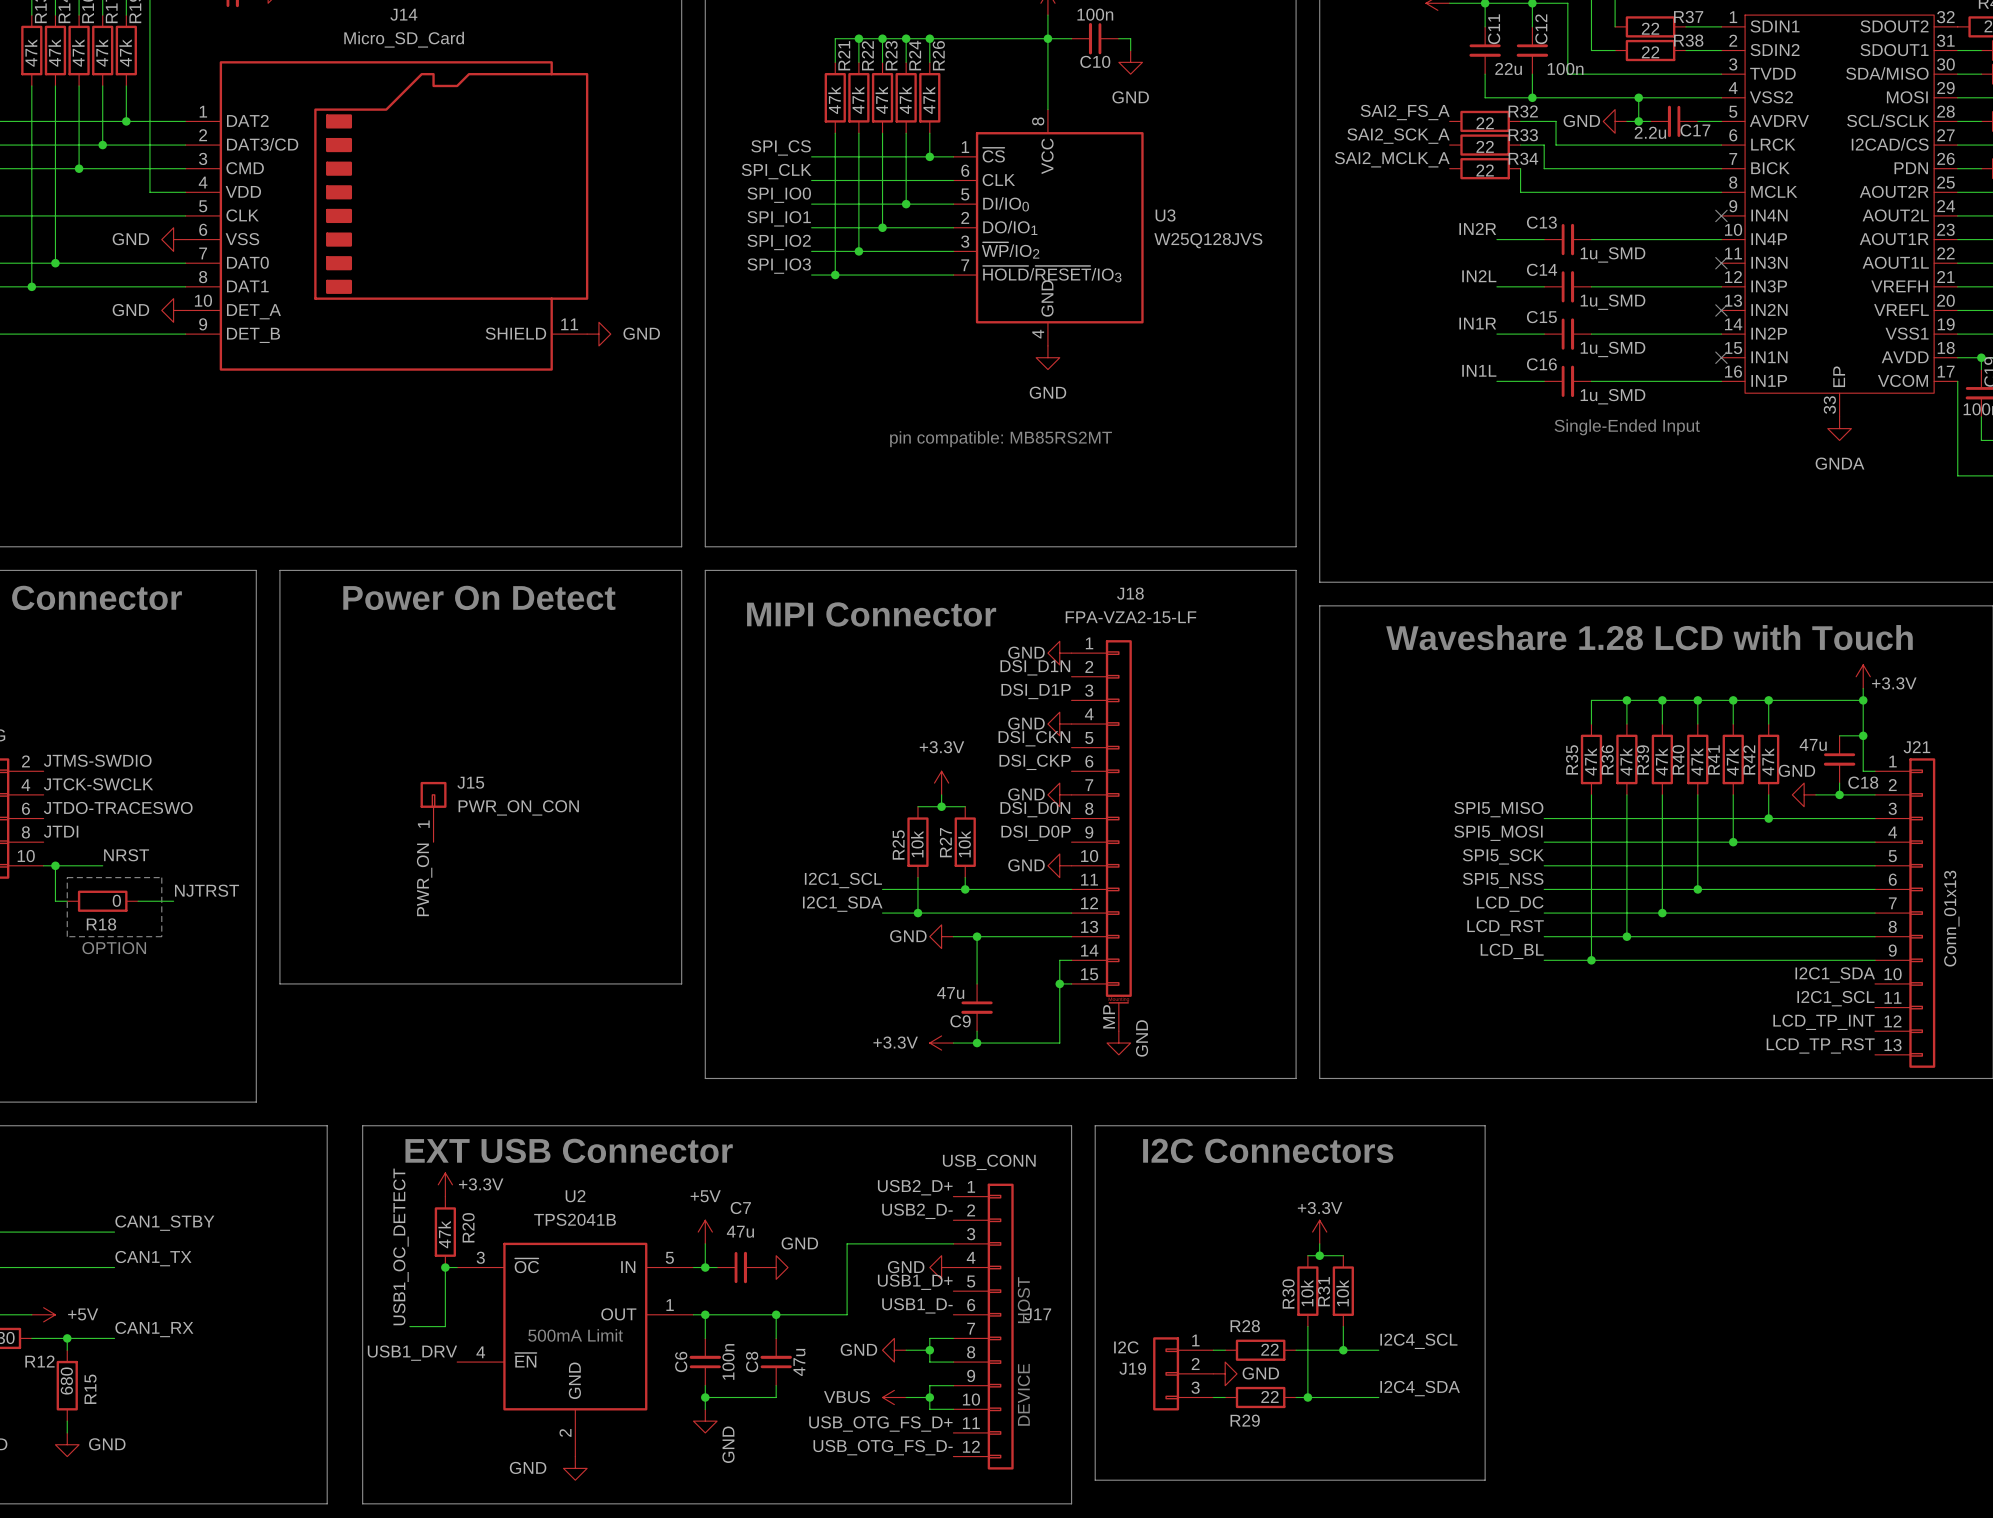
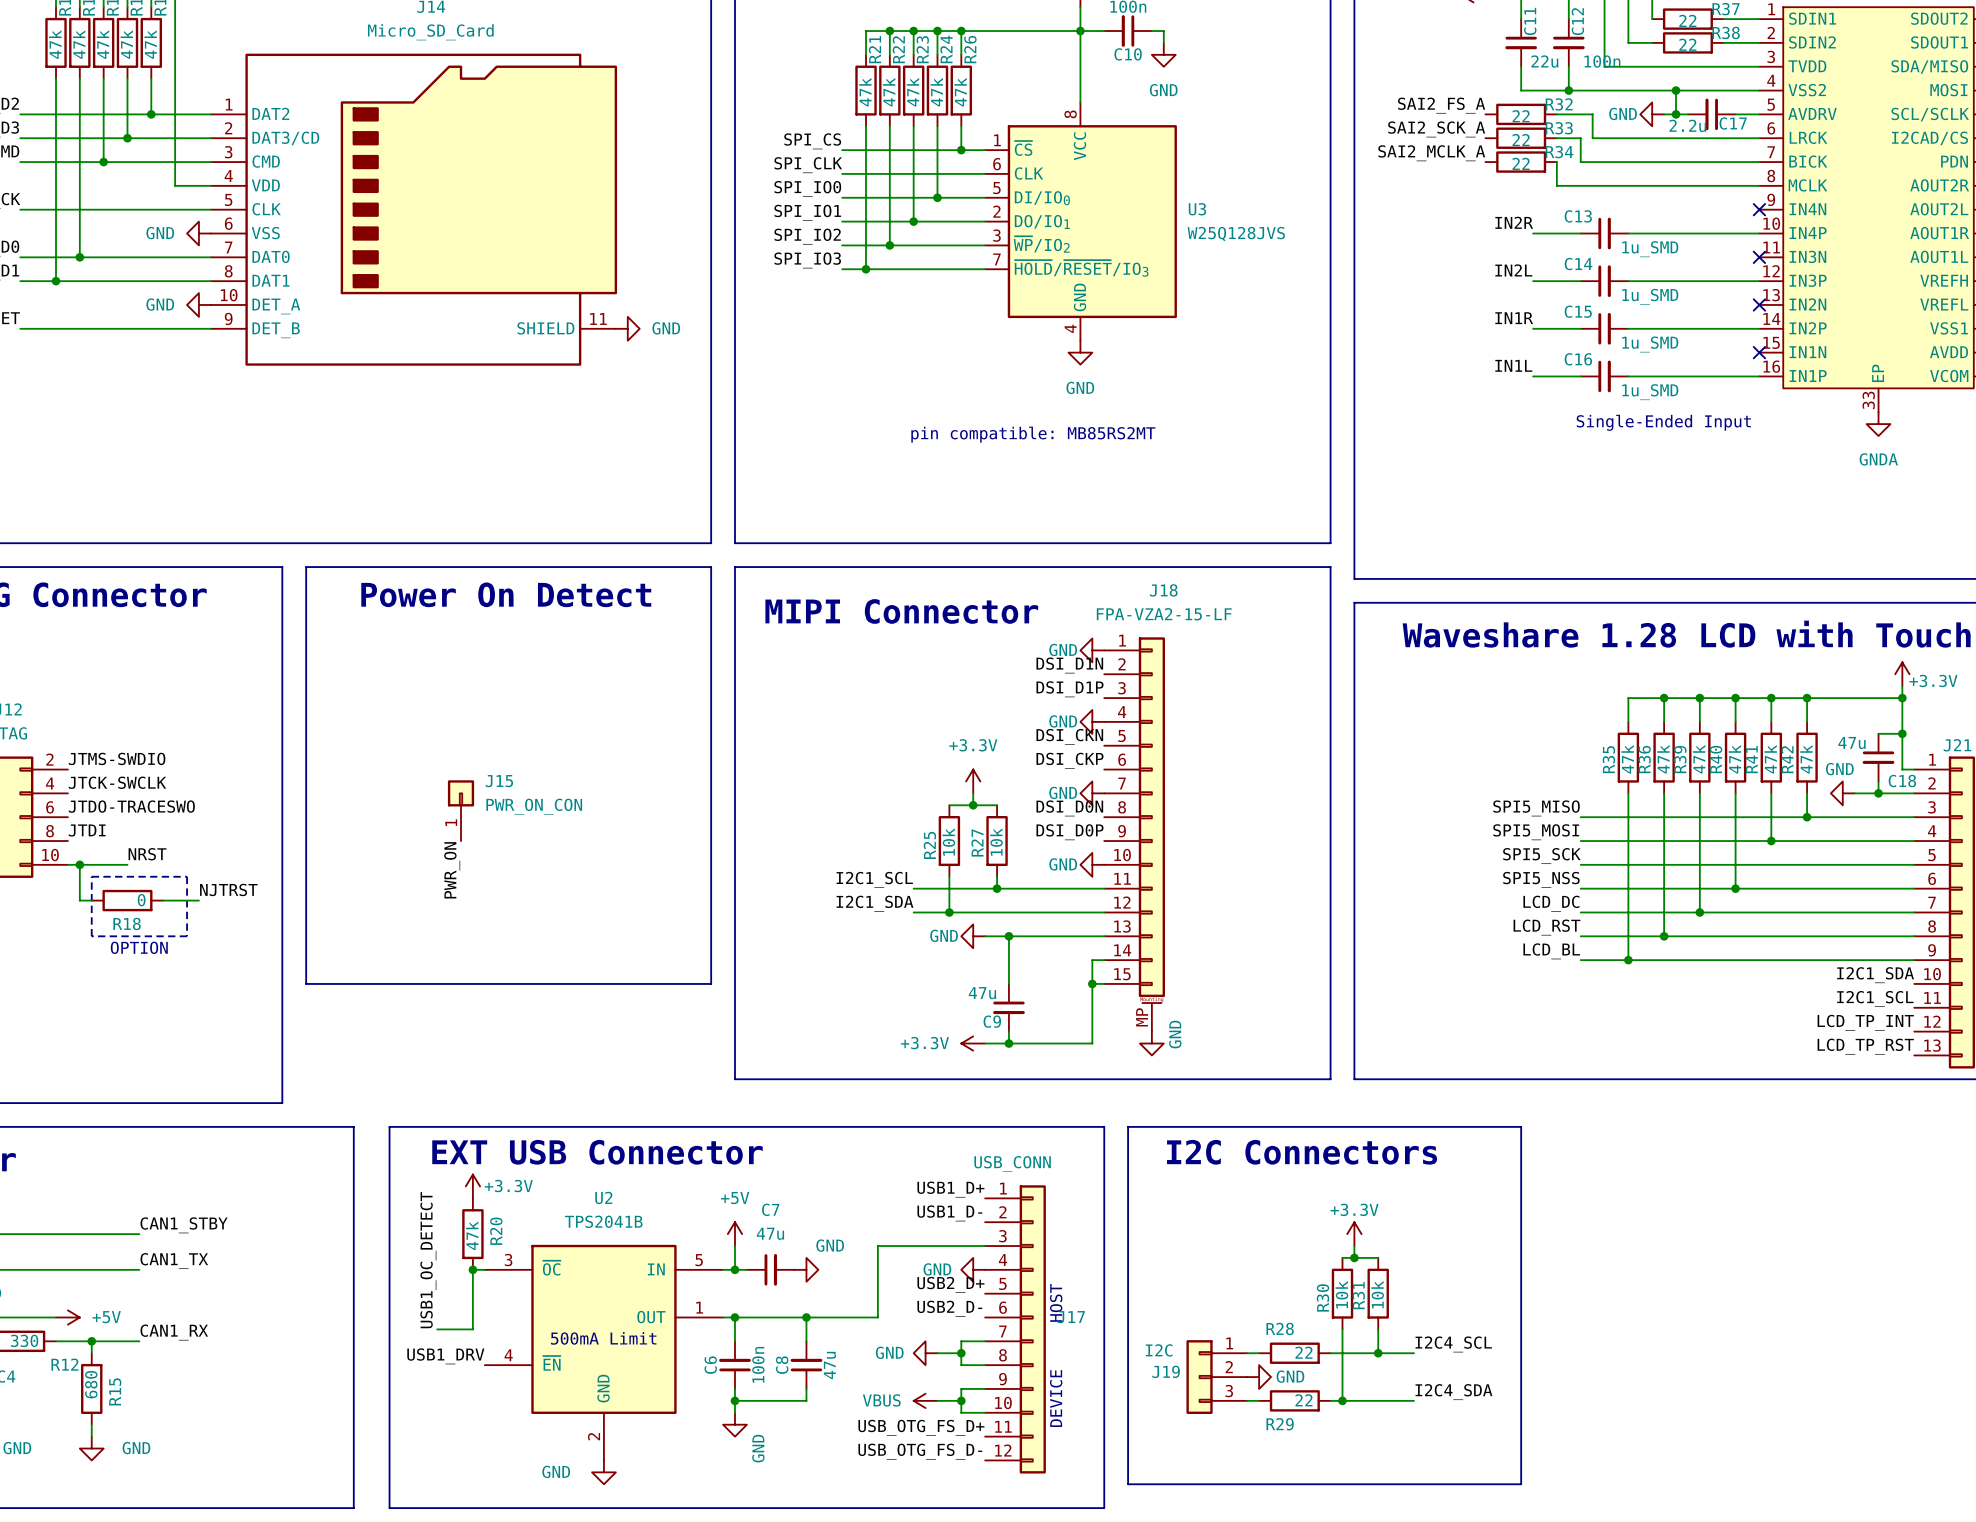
label: USB2_D+ (915, 1187) -> USB1_D+ (950, 1189)
label: USB2_D- (917, 1211) -> USB1_D- (949, 1213)
label: USB1_D+ (915, 1282) -> USB2_D+ (950, 1284)
label: USB1_D- (917, 1305) -> USB2_D- (949, 1308)

